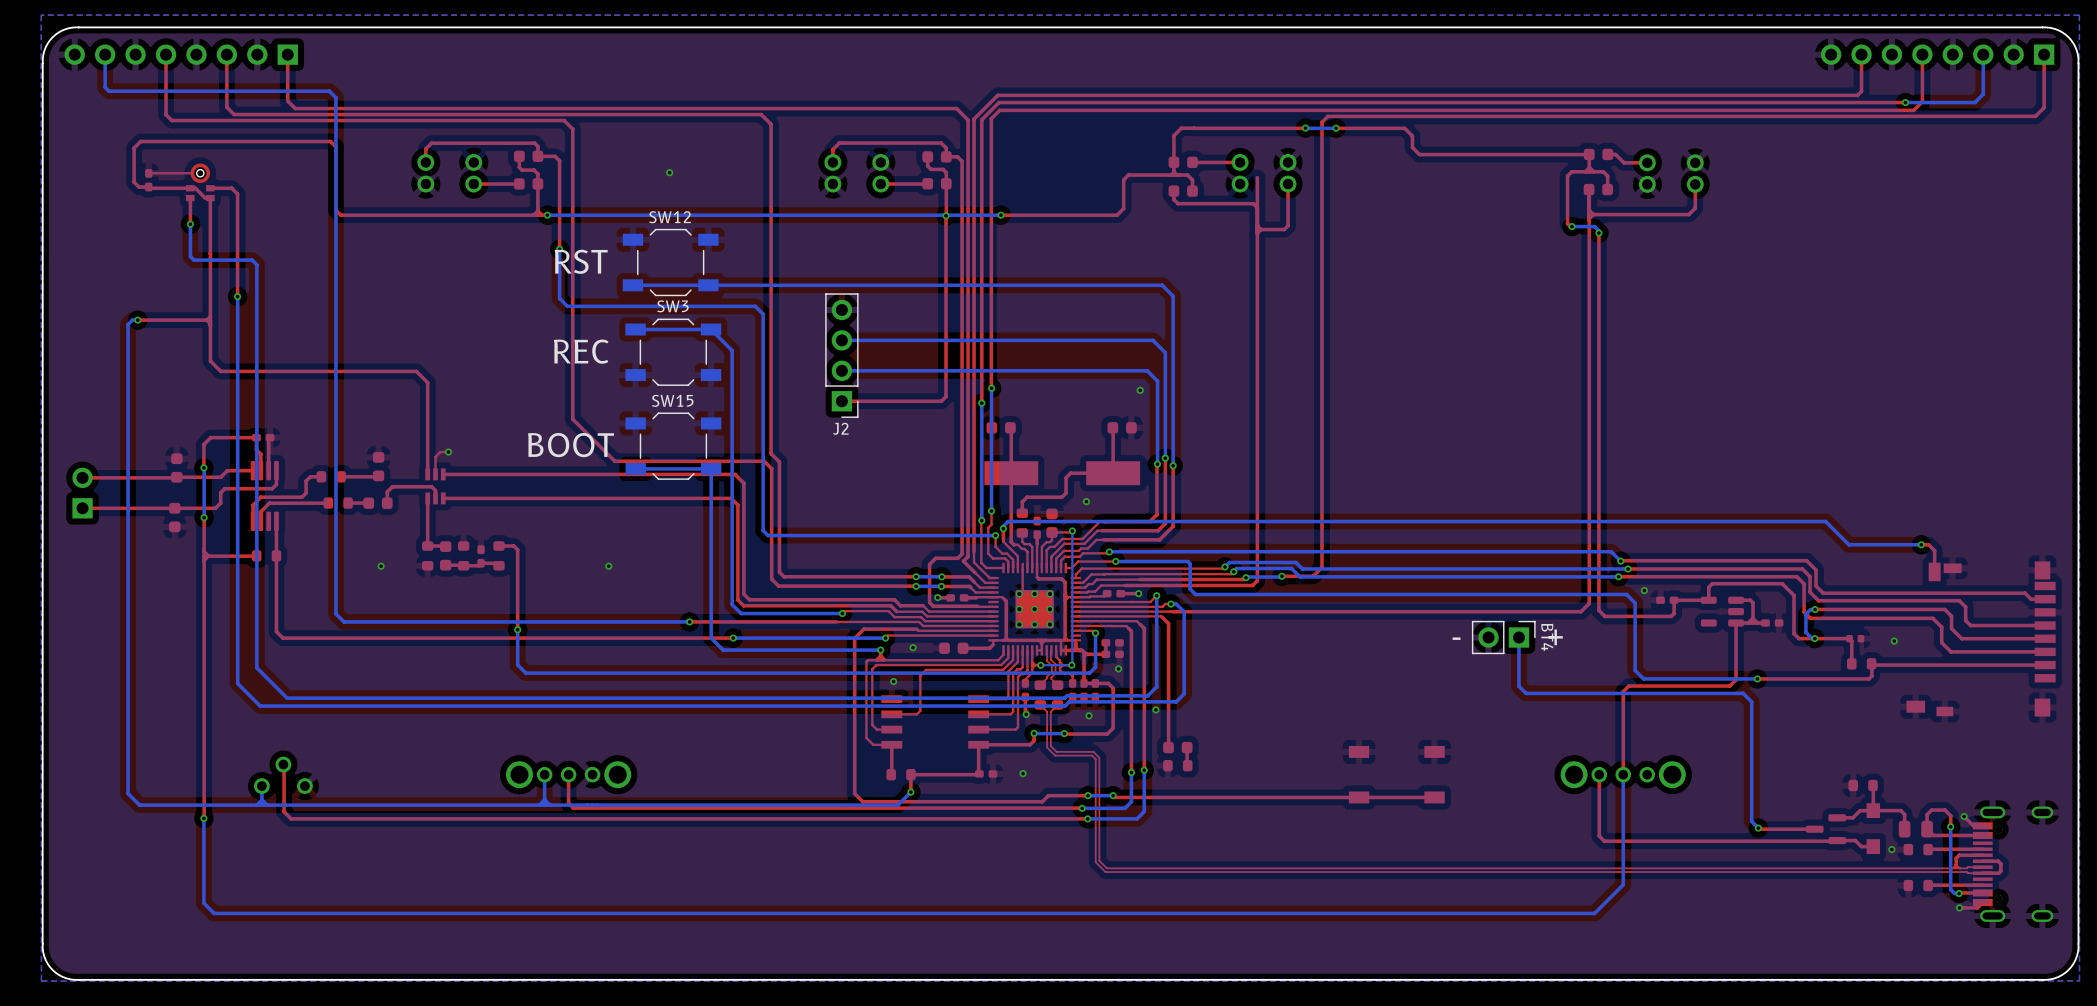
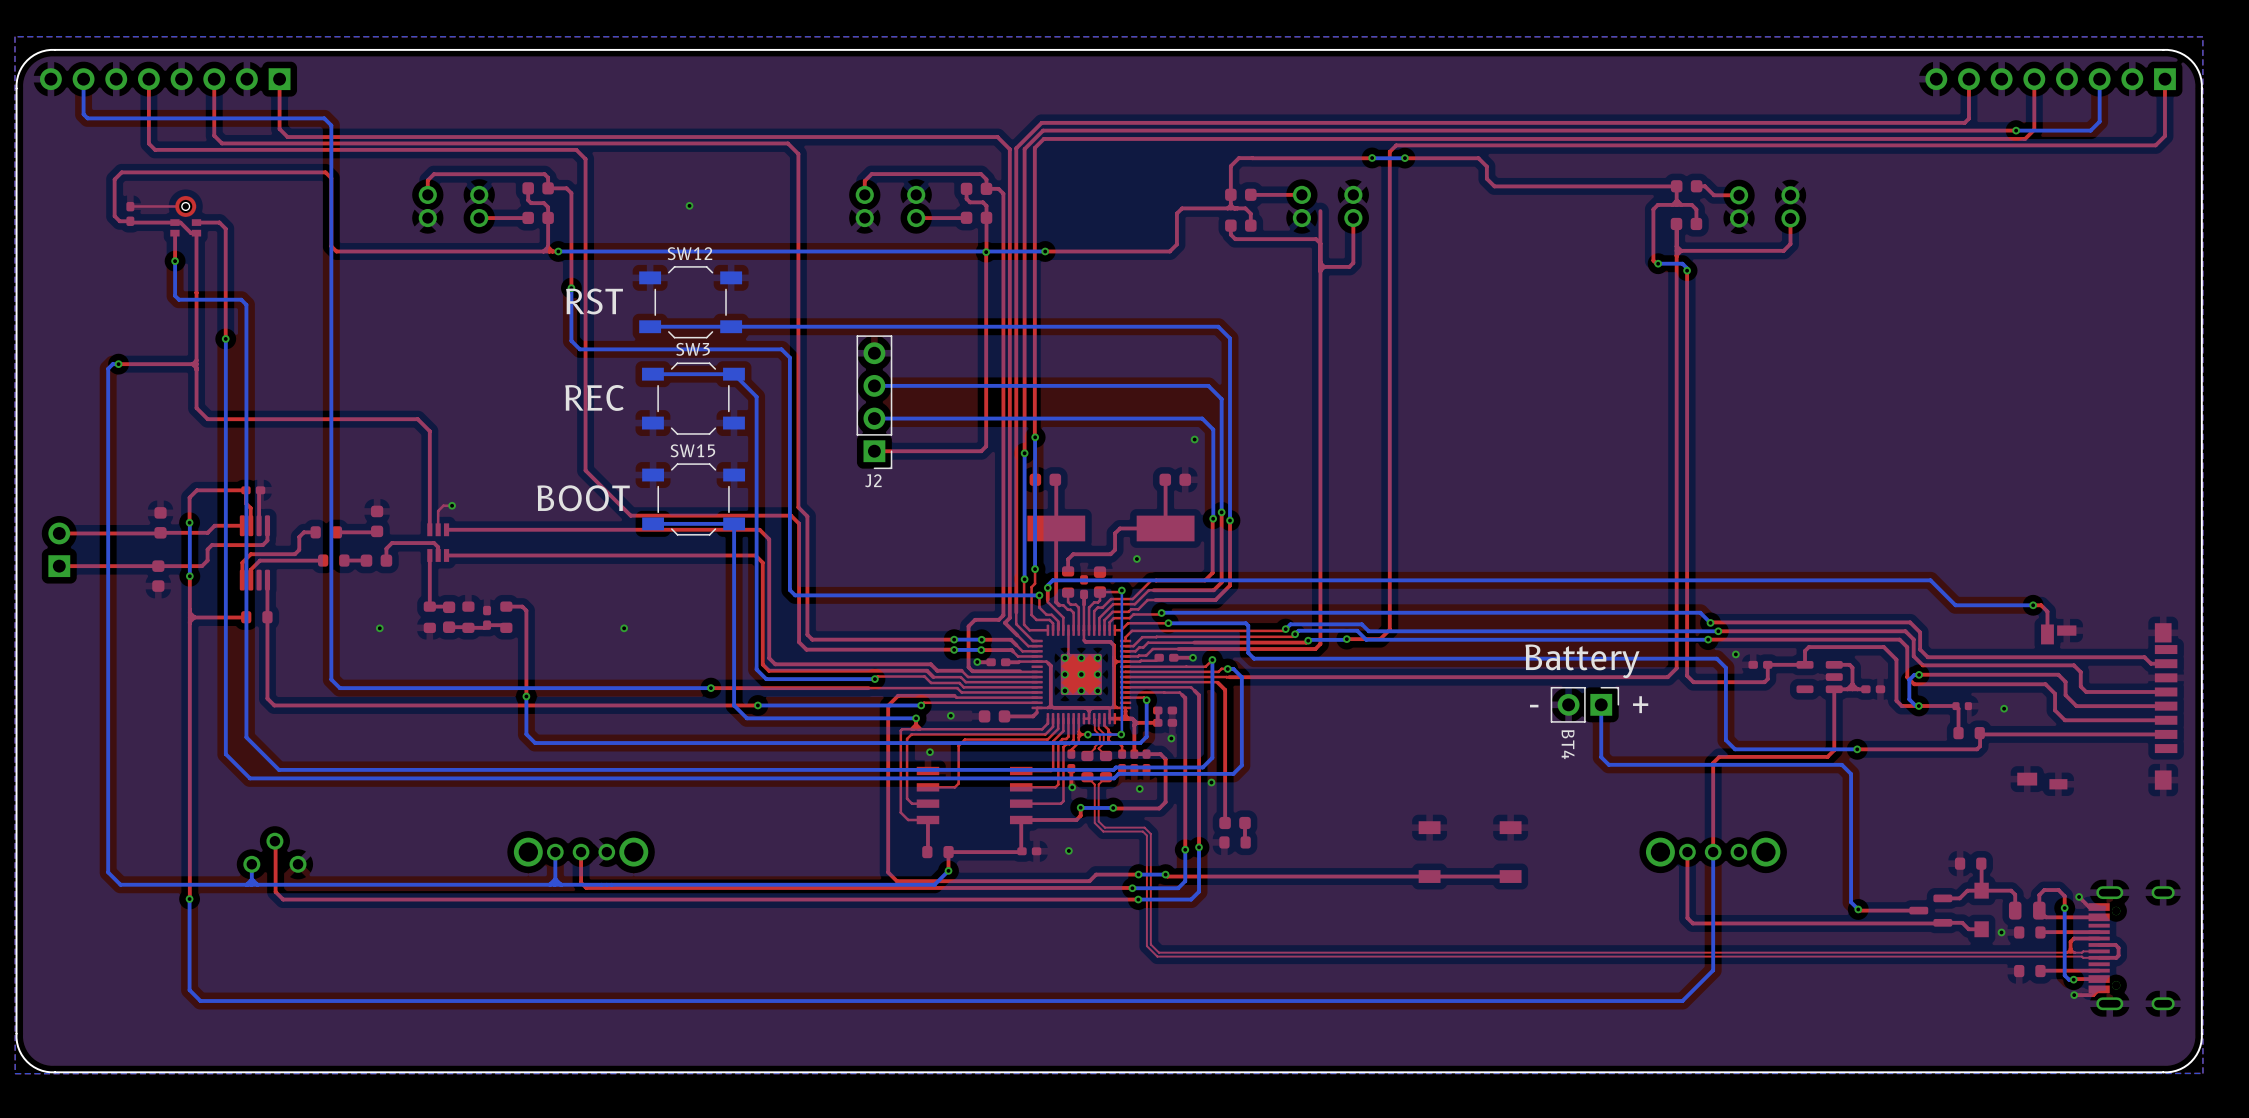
text: none -> Battery (1582, 661)
BT4 name position: BT4 (1547, 637) -> BT4 (1568, 744)

